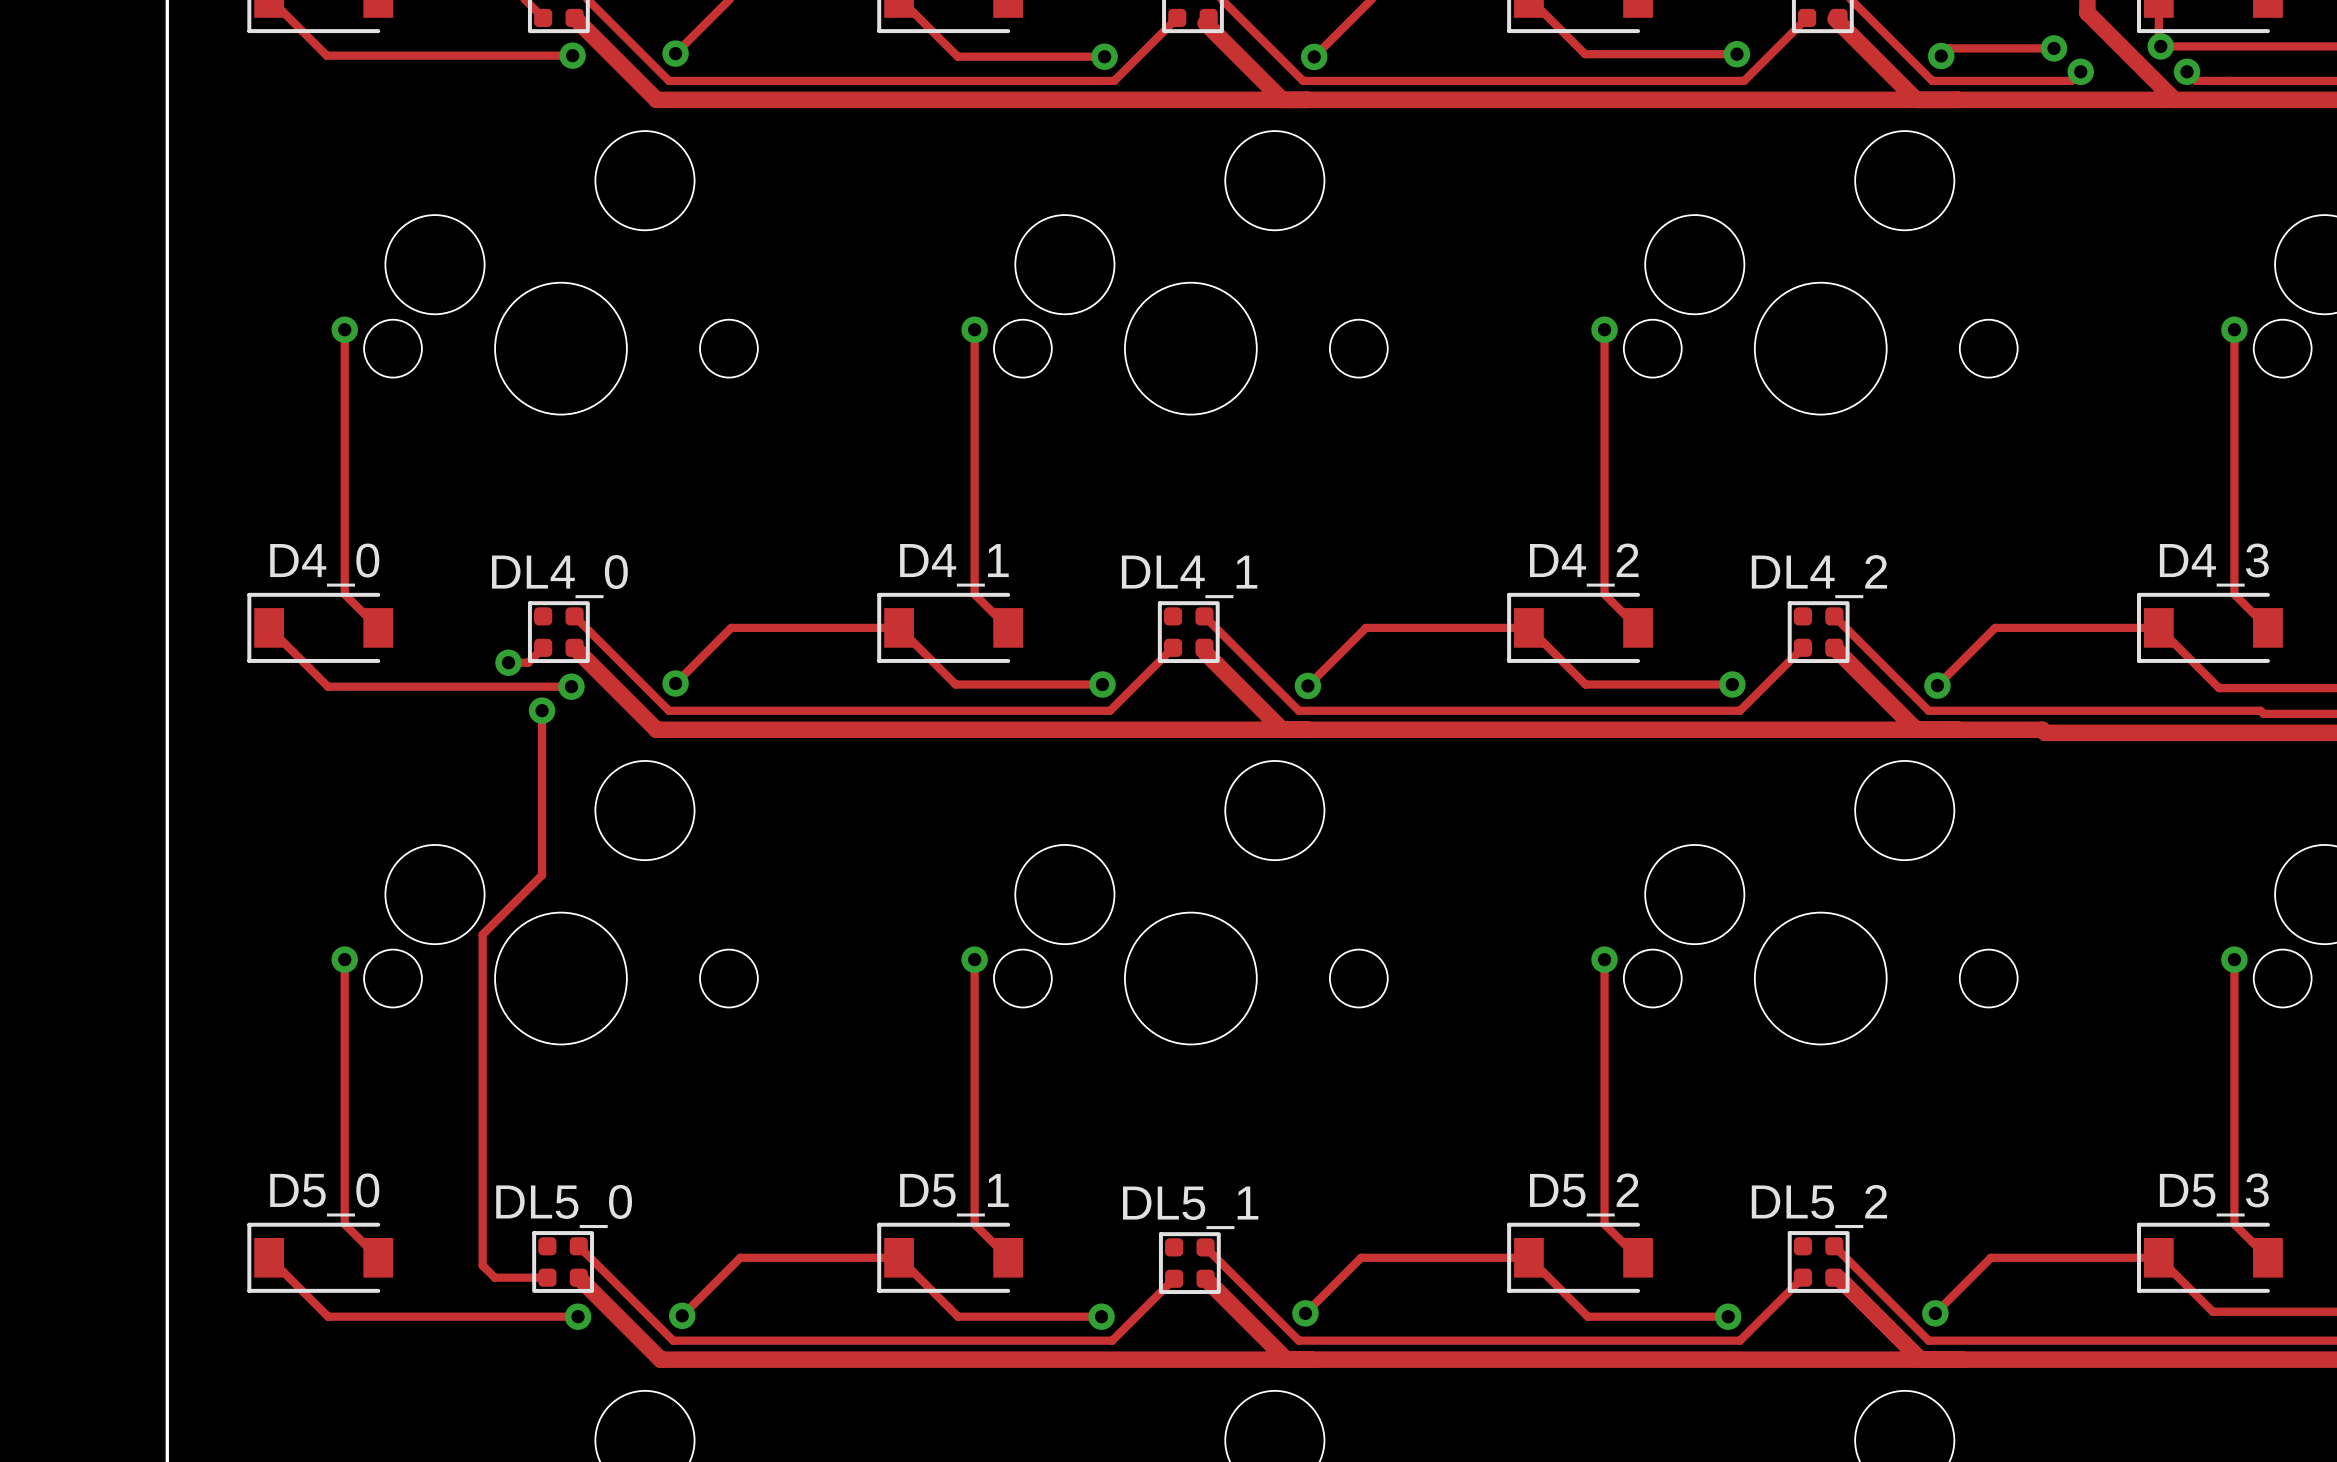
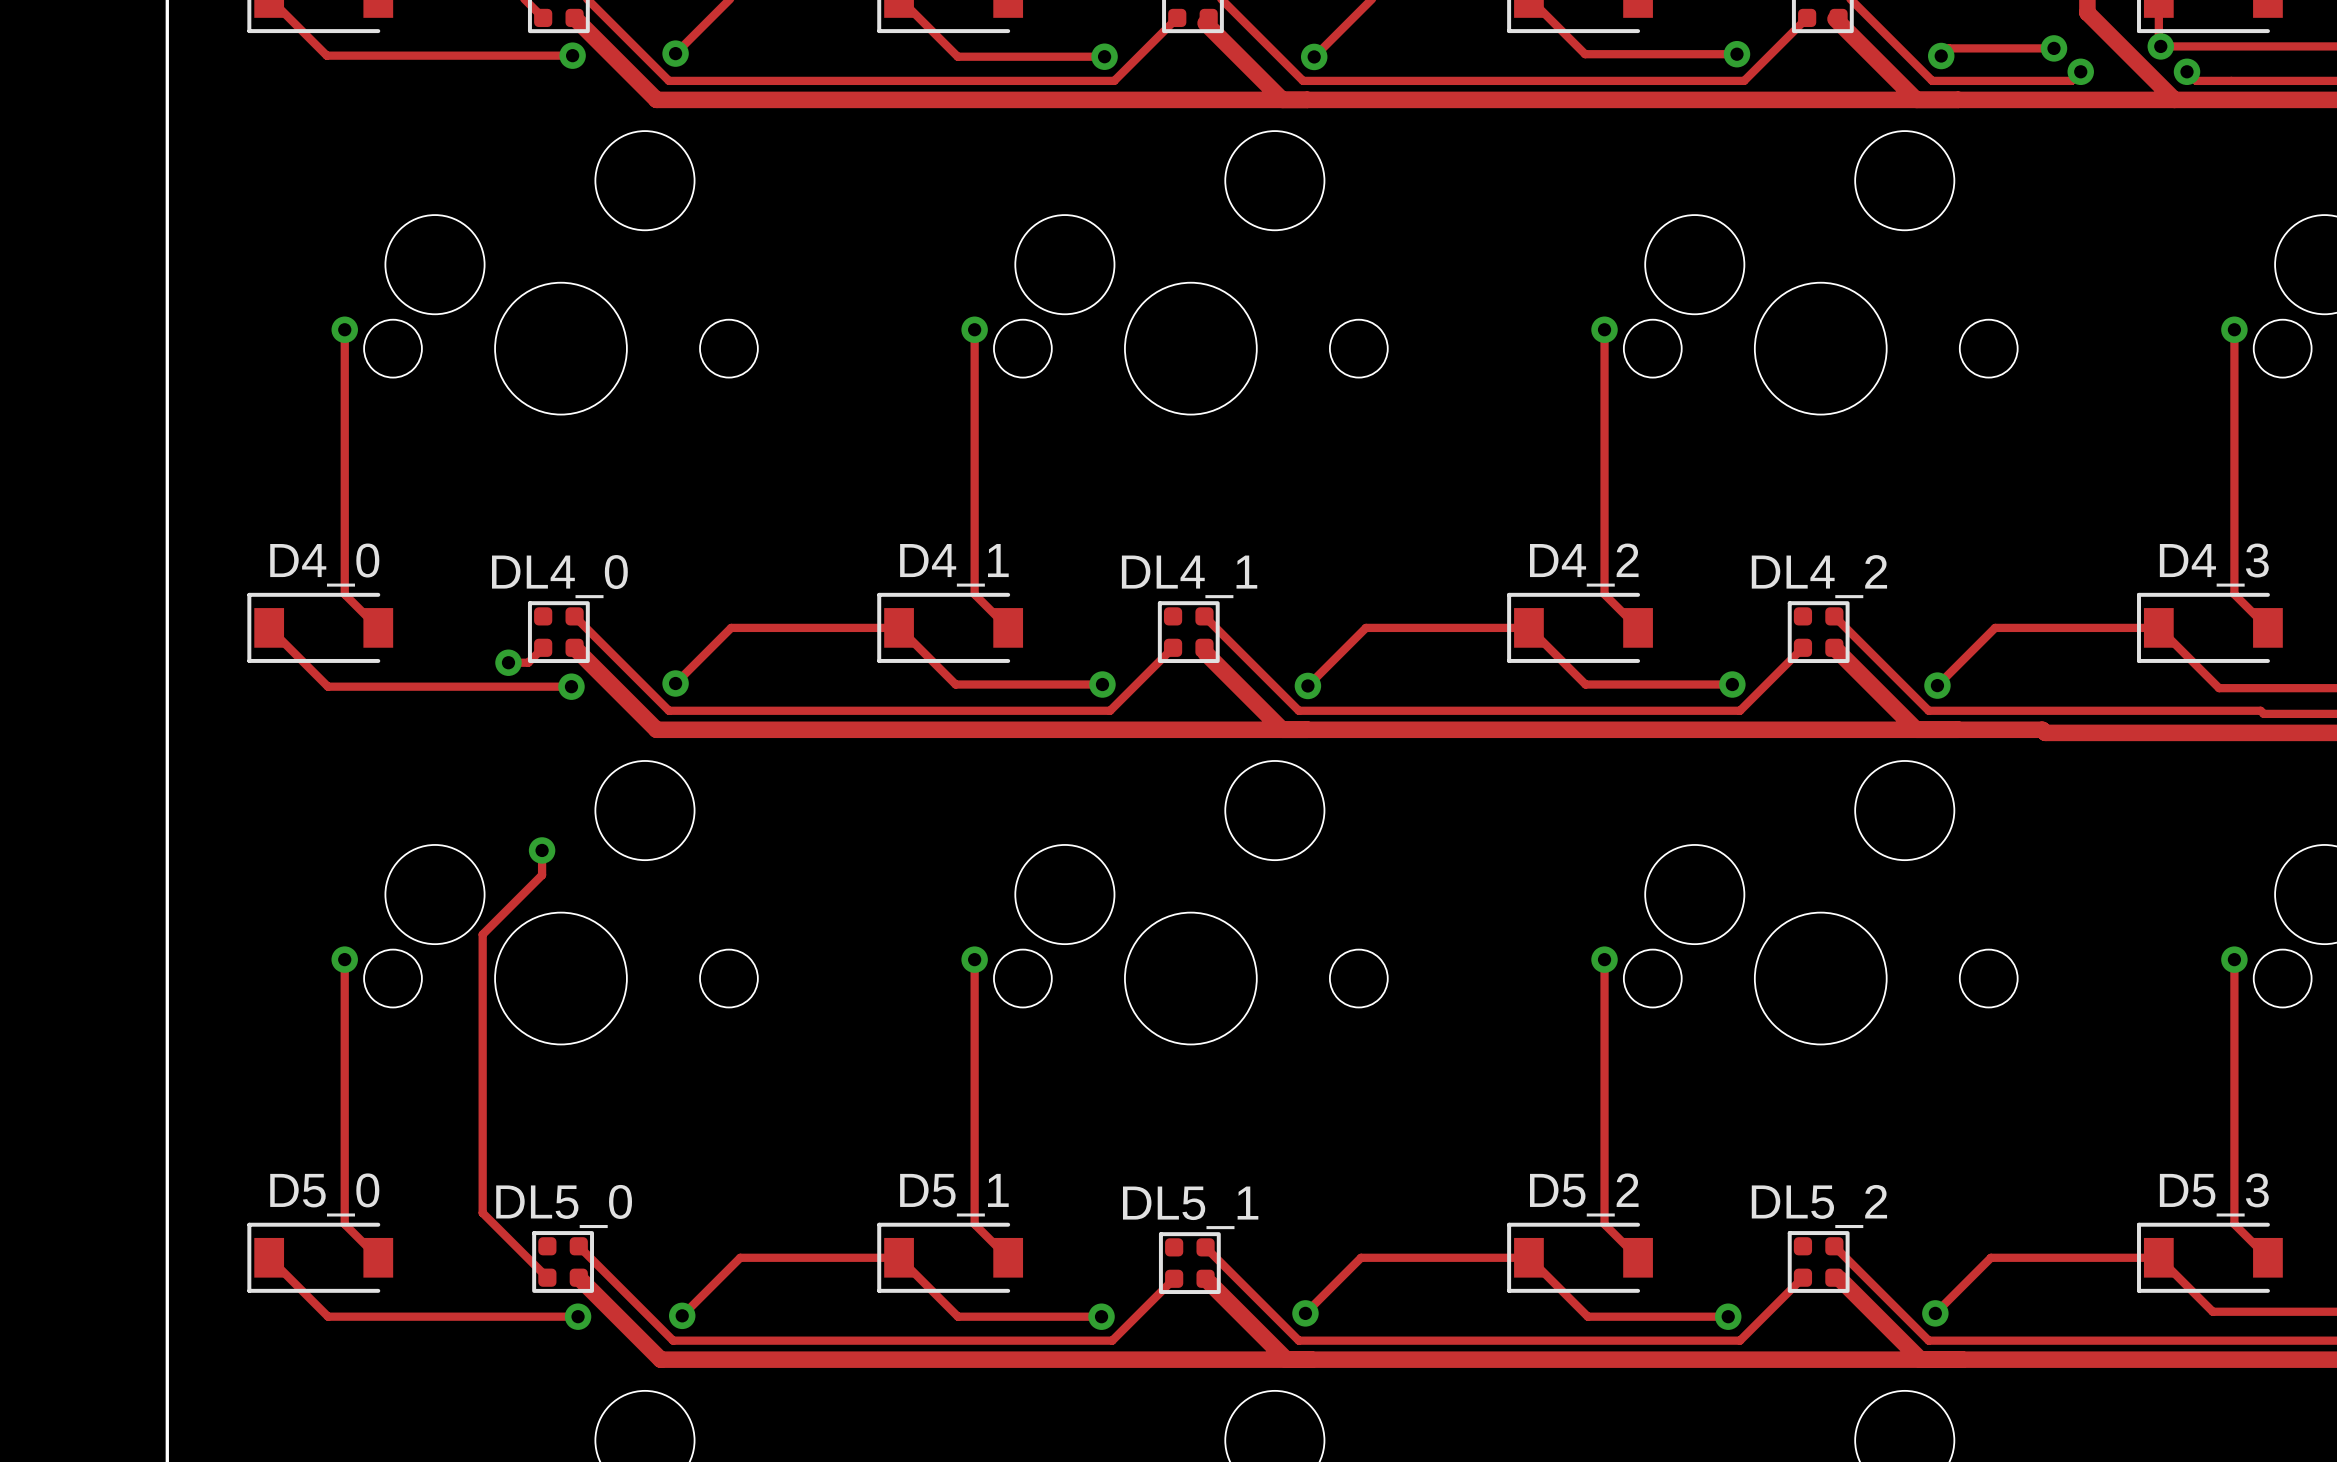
track: (542, 710) (542, 850) -> none
via position: (542, 710) -> (542, 850)
track: (482, 1212) (482, 1265) (494, 1277) (547, 1277) -> (482, 1212) (547, 1277)

